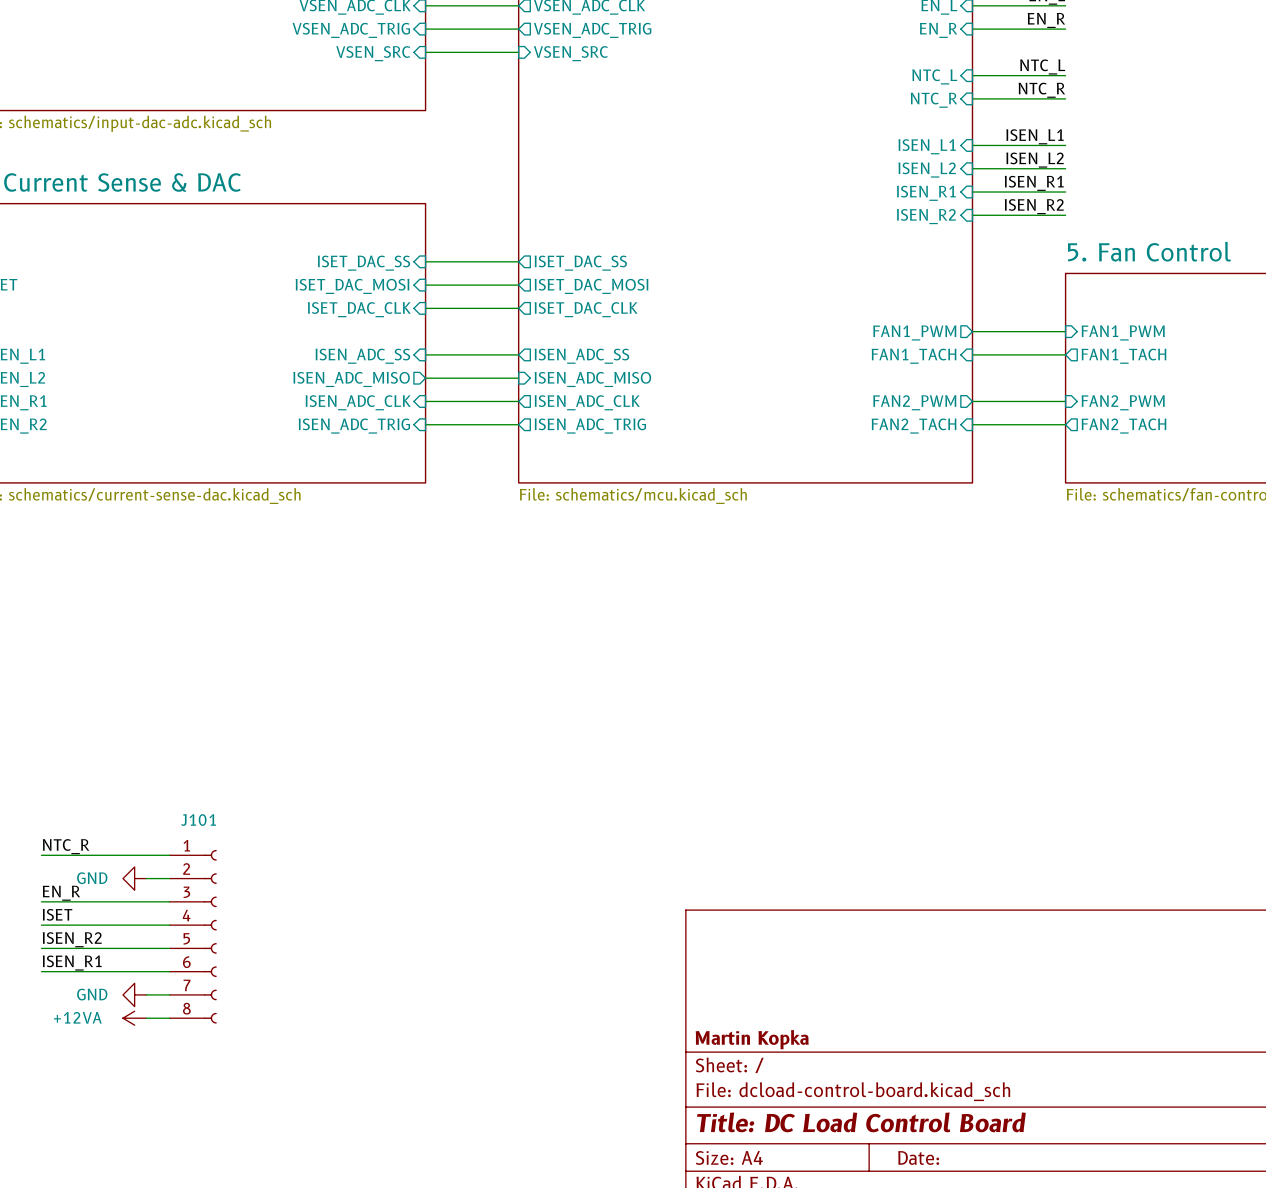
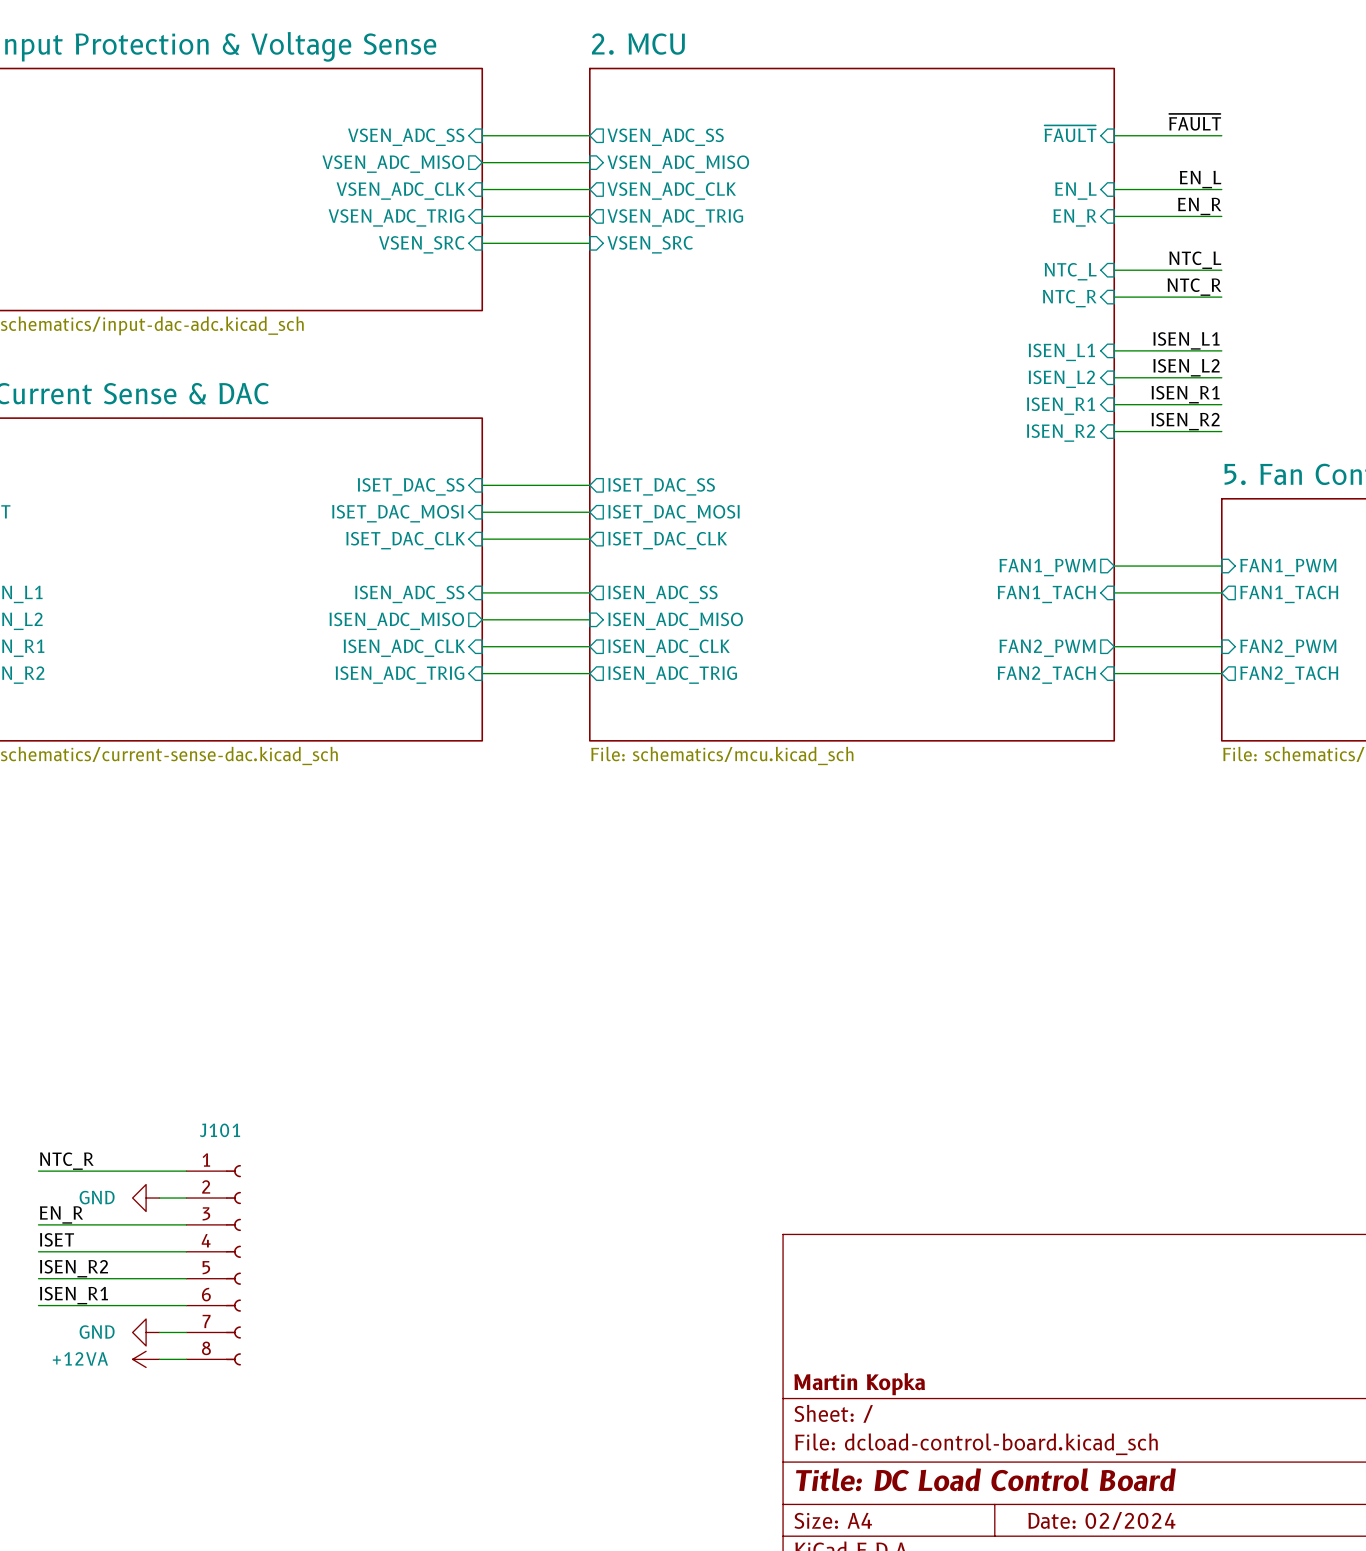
title block: Date: (918, 1158) -> Date: 02/2024 (1101, 1520)

